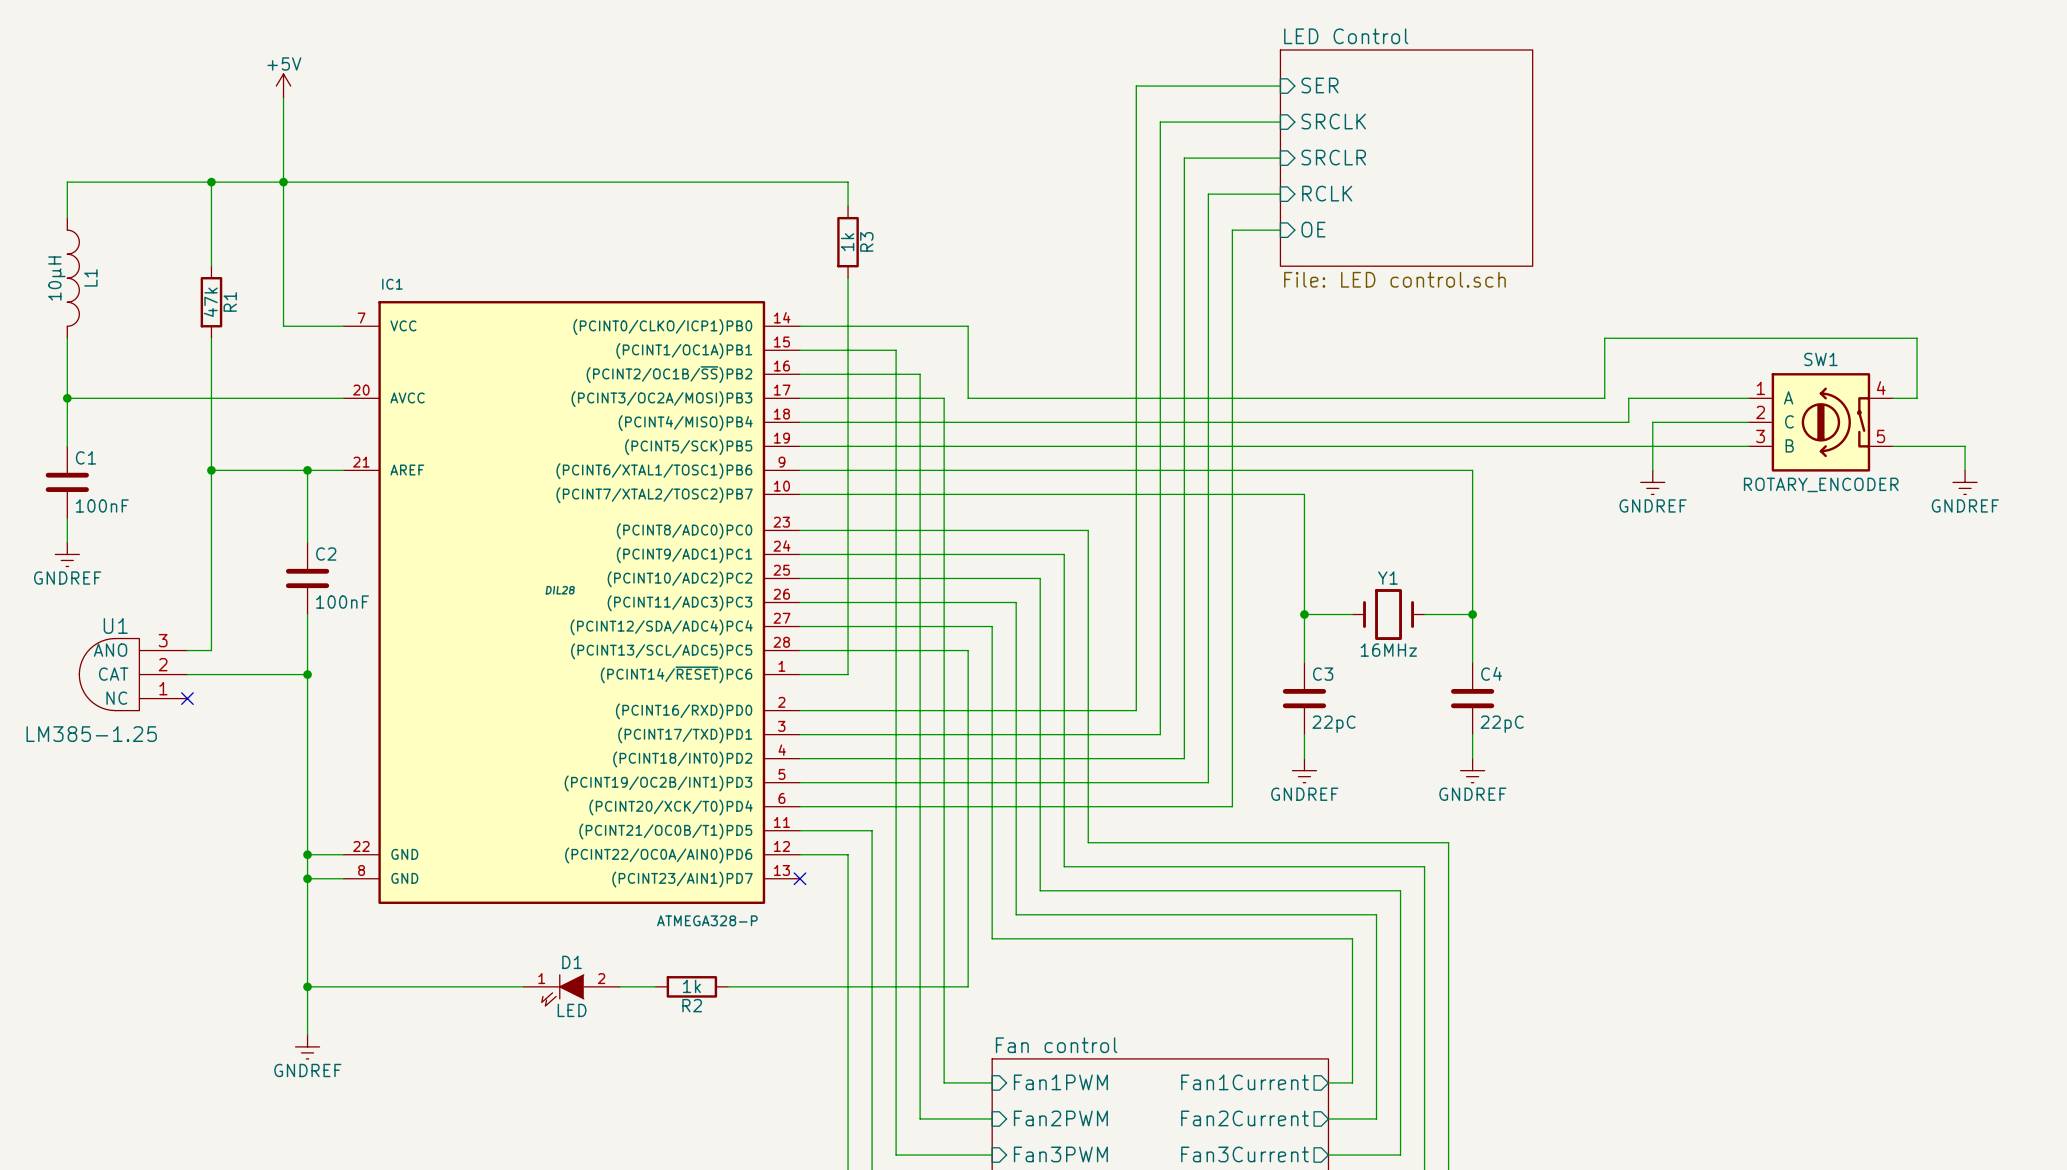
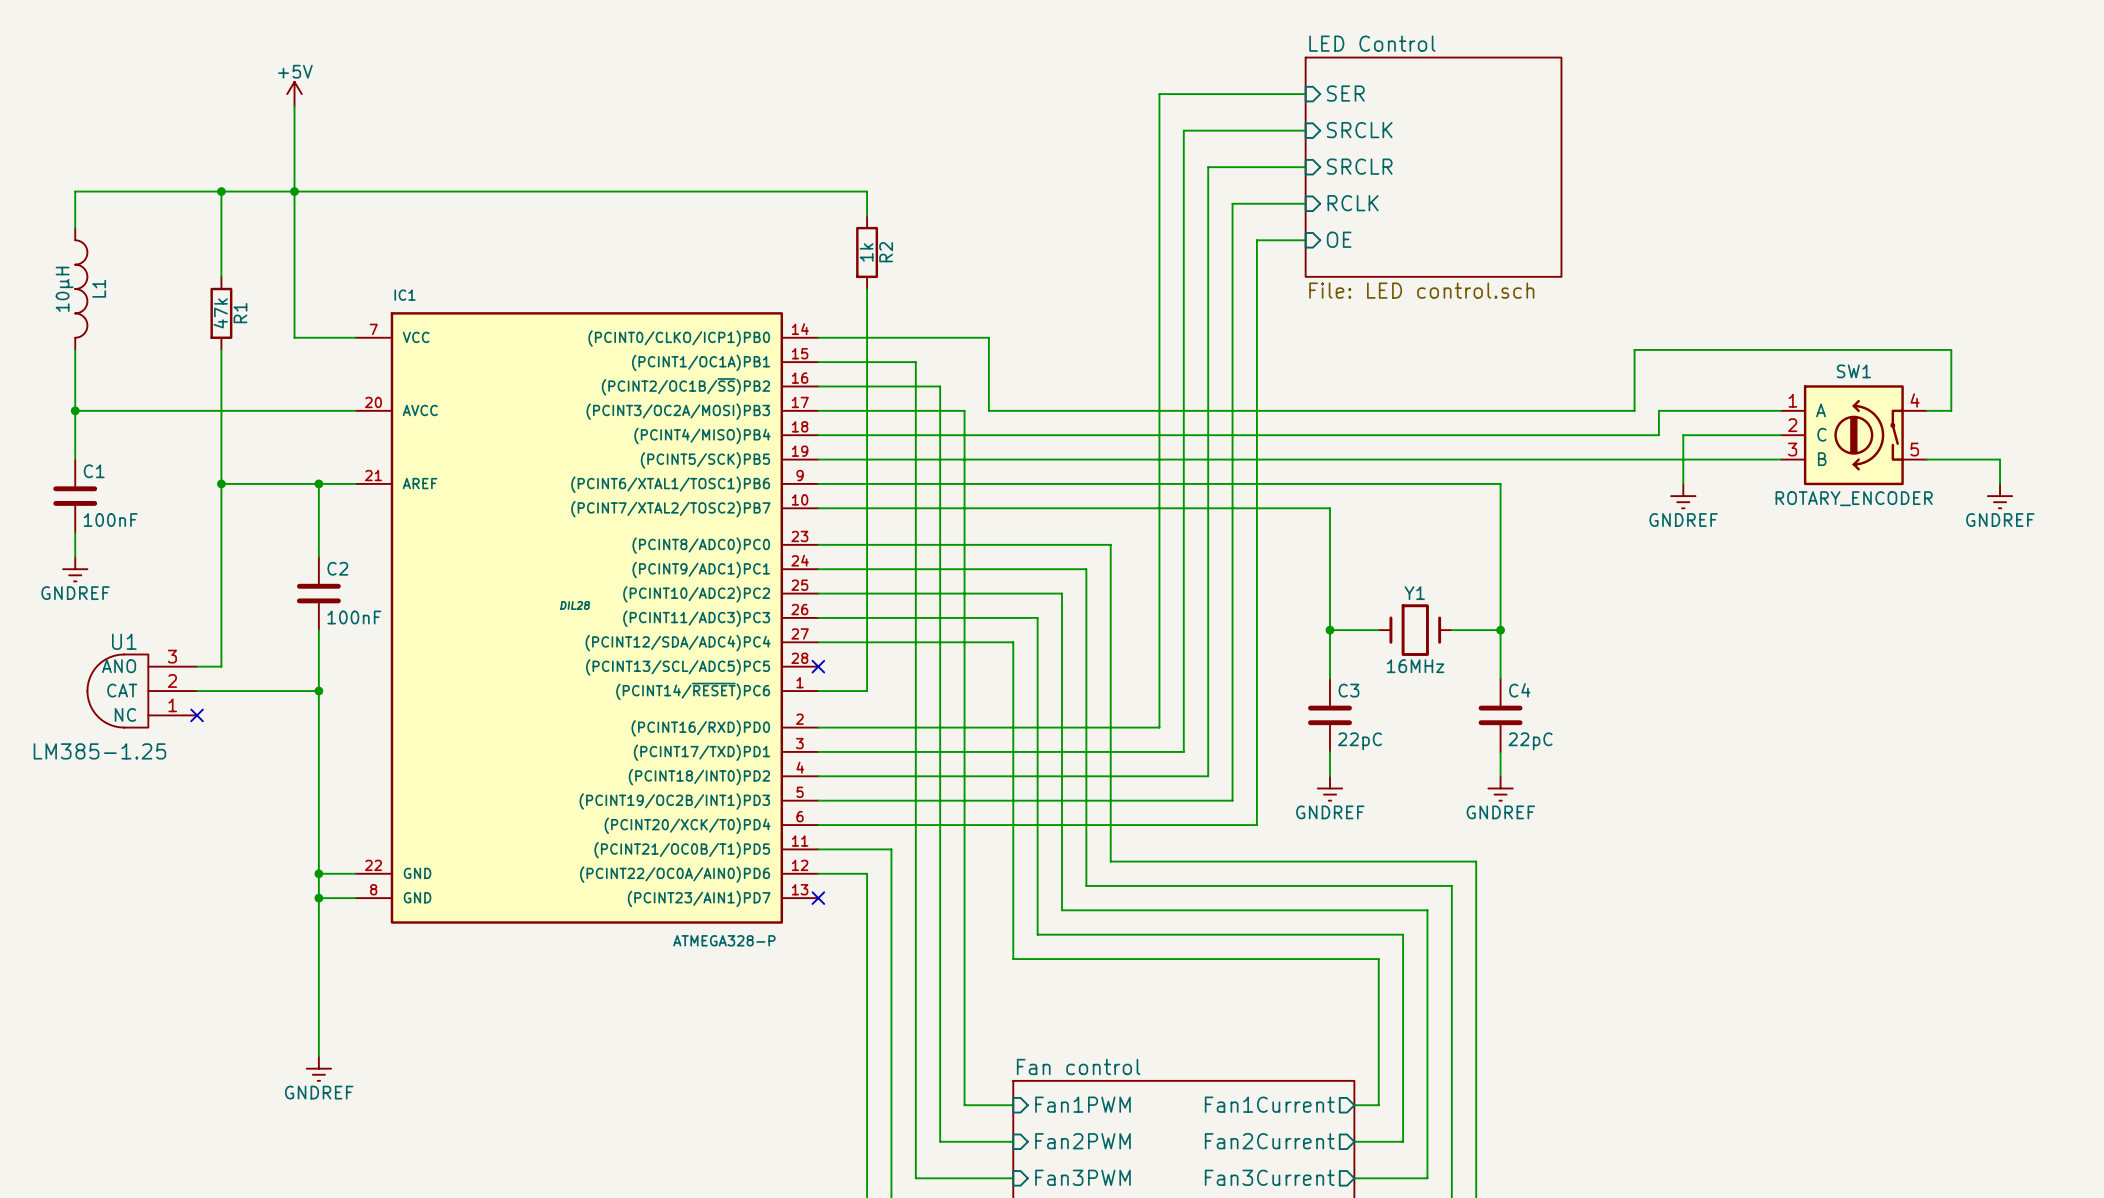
R3 name: R3 (866, 241) -> R2 (886, 252)
wire: (799, 650) (968, 650) (968, 986) (727, 986) -> none
no-connect mark: none -> (818, 666)
wire: (307, 986) (523, 986) -> none
junction: (307, 986) -> none
wire: (619, 986) (655, 986) -> none
R2: 1k (691, 986) -> none
D1: LED (571, 990) -> none

